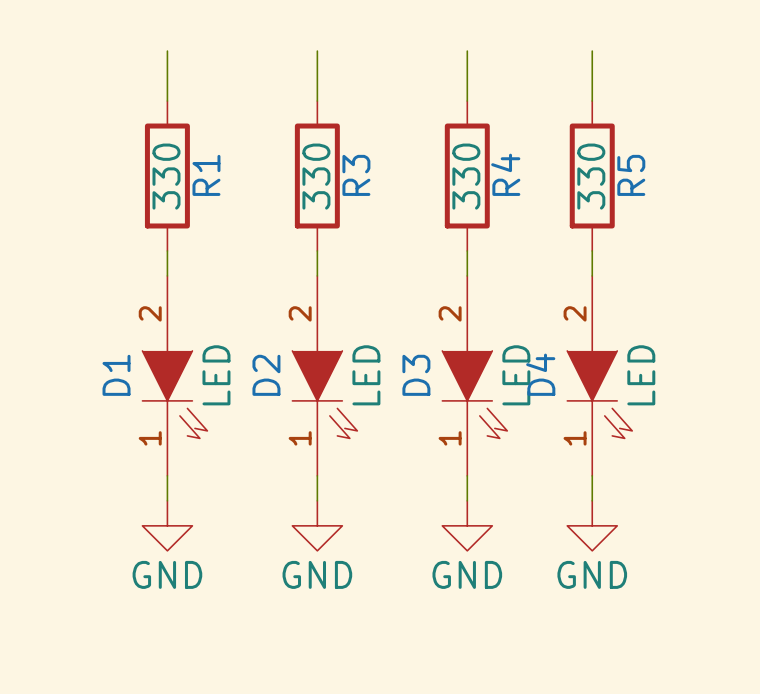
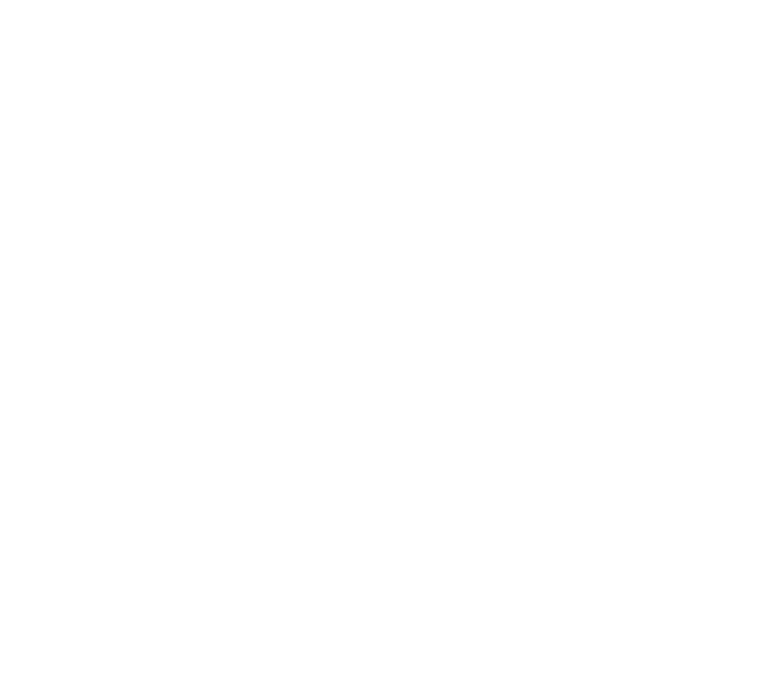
wire: (167, 51) (167, 101) -> none
wire: (317, 51) (317, 101) -> none
wire: (467, 51) (467, 101) -> none
wire: (592, 51) (592, 101) -> none
R1: 330 (167, 175) -> none
R3: 330 (317, 175) -> none
R4: 330 (467, 175) -> none
R5: 330 (592, 175) -> none
wire: (167, 250) (167, 275) -> none
wire: (317, 250) (317, 275) -> none
wire: (467, 250) (467, 275) -> none
wire: (592, 250) (592, 275) -> none
D1: LED (174, 375) -> none
D2: LED (324, 375) -> none
D3: LED (474, 375) -> none
D4: LED (599, 375) -> none
wire: (167, 475) (167, 500) -> none
wire: (317, 475) (317, 500) -> none
wire: (467, 475) (467, 500) -> none
wire: (592, 475) (592, 500) -> none
power symbol: GND (167, 525) -> none
power symbol: GND (317, 525) -> none
power symbol: GND (467, 525) -> none
power symbol: GND (592, 525) -> none

